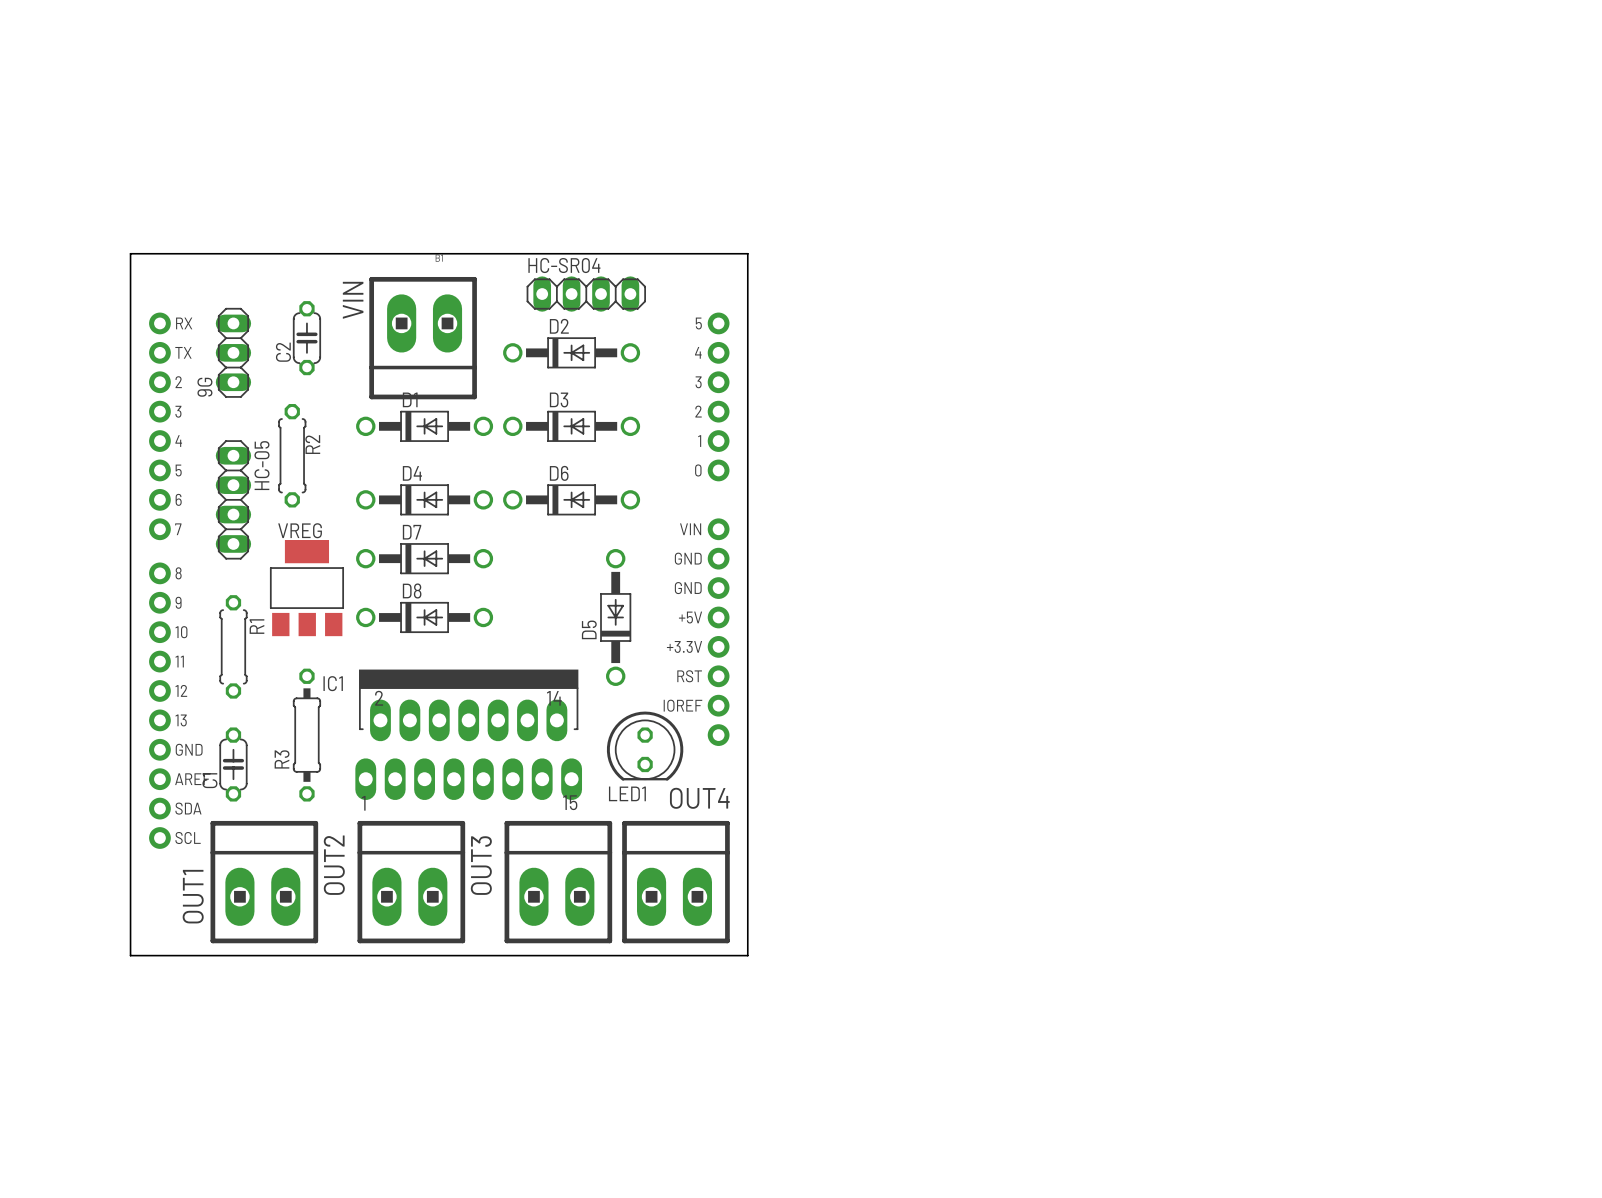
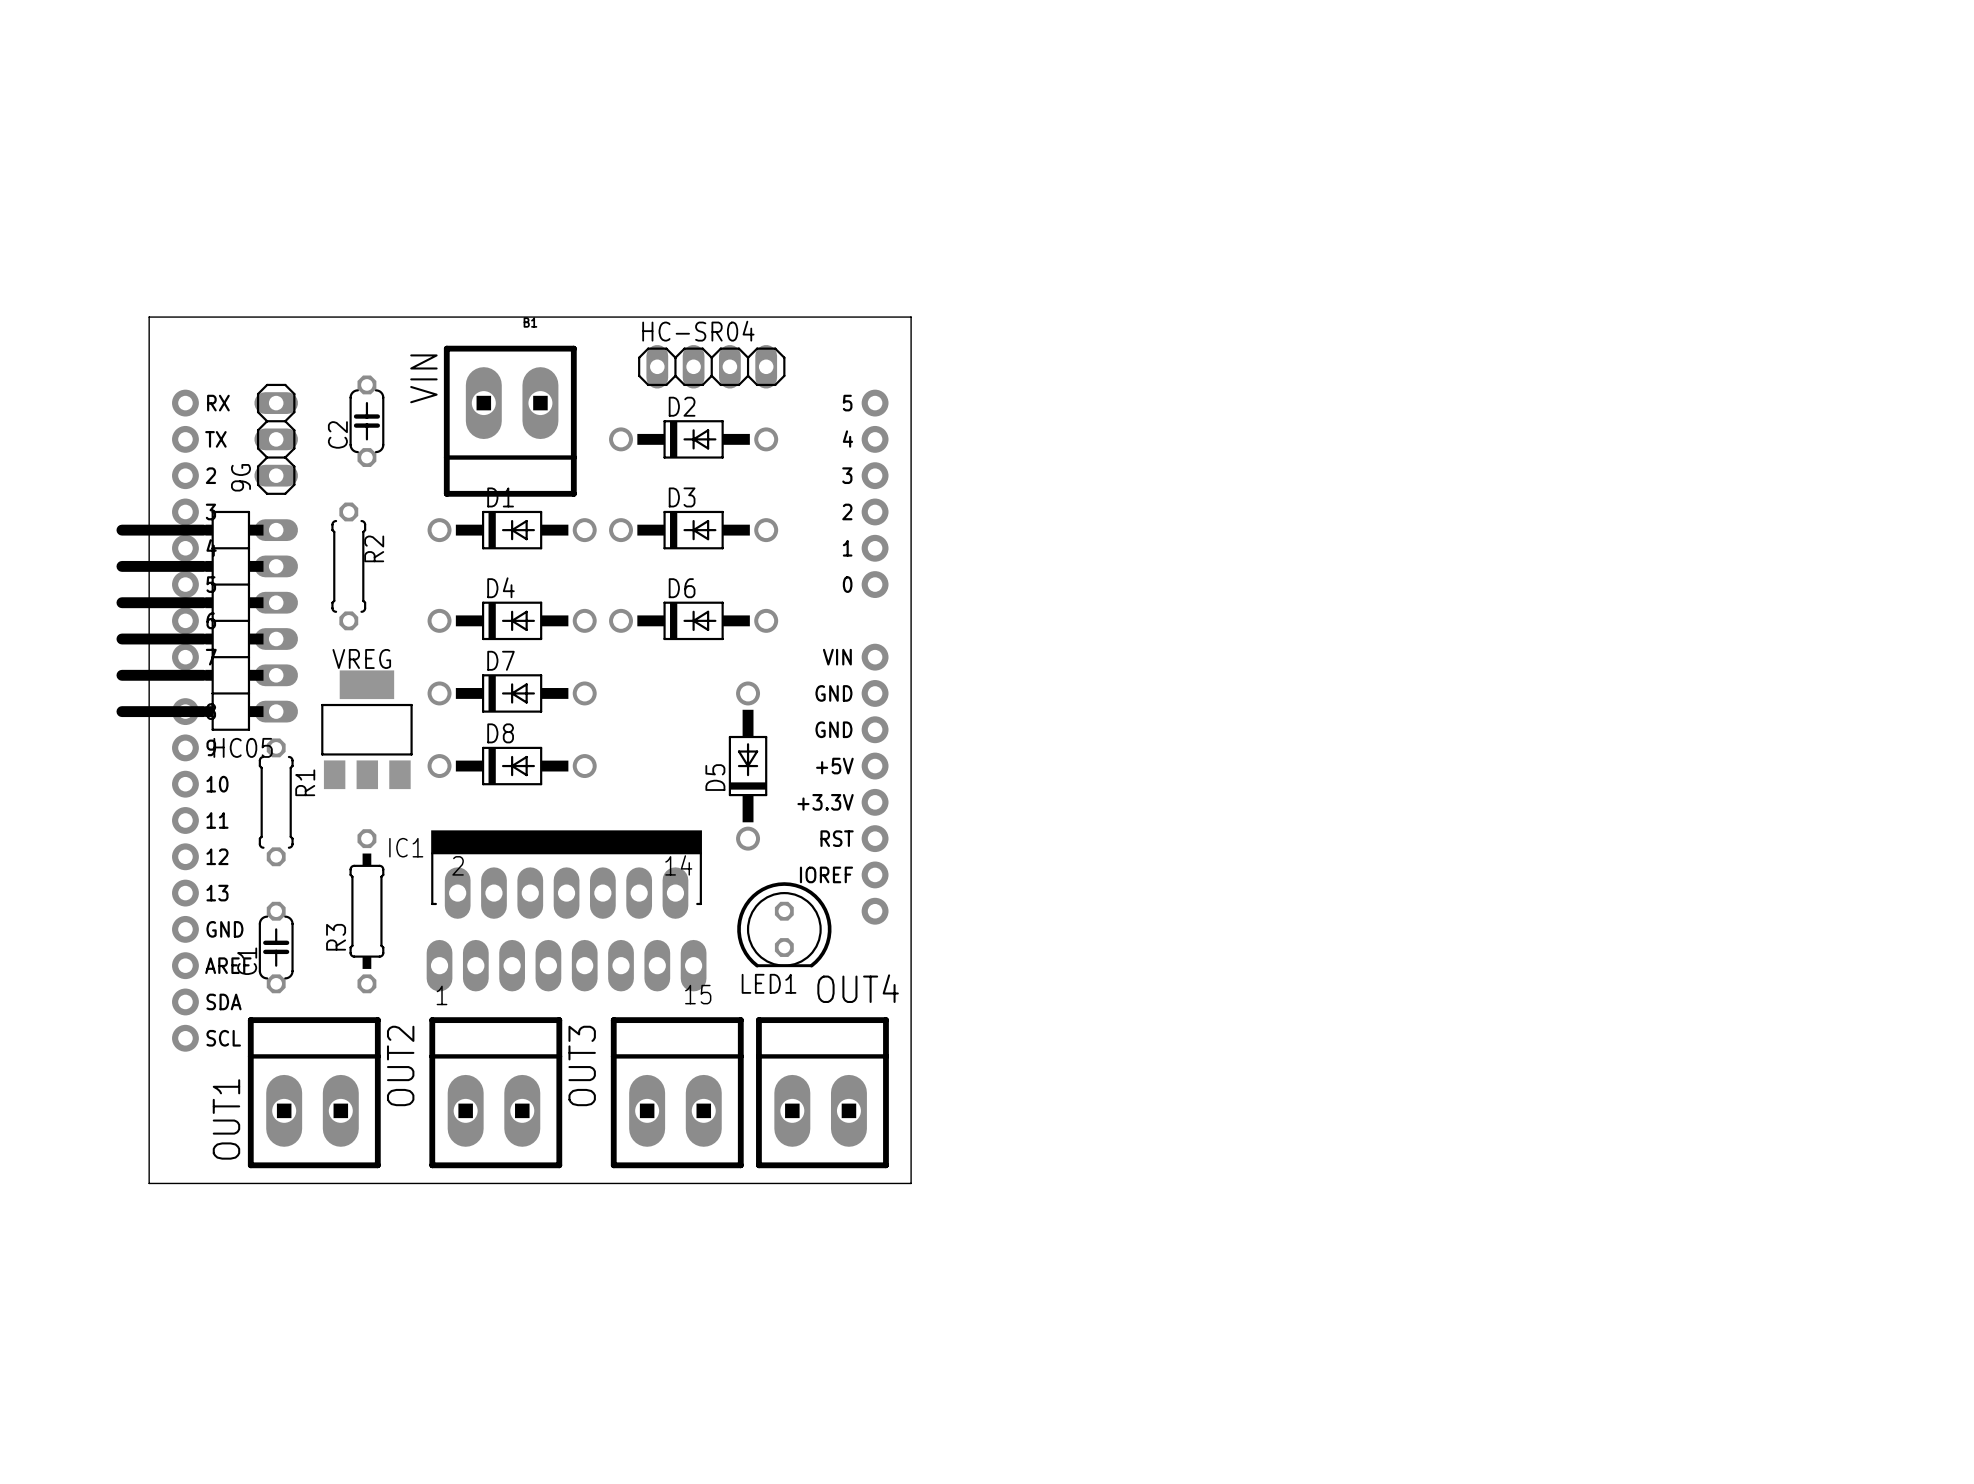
HC05: none -> (207, 620)
HC-05: (233, 499) -> none

